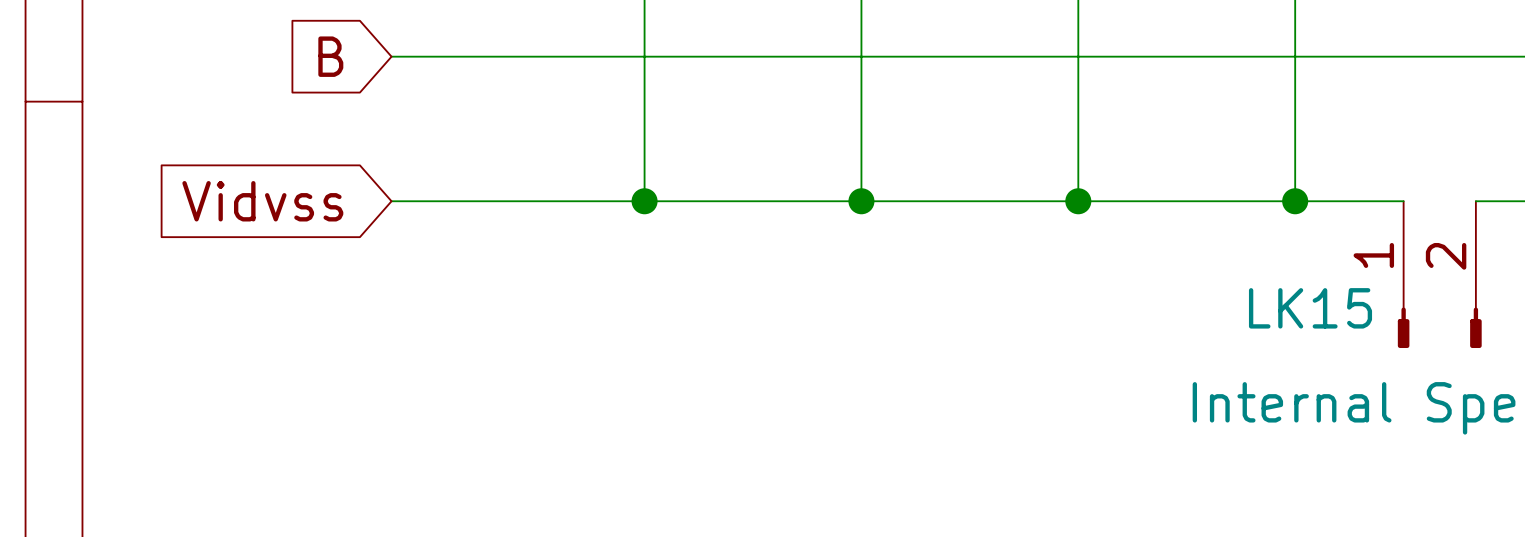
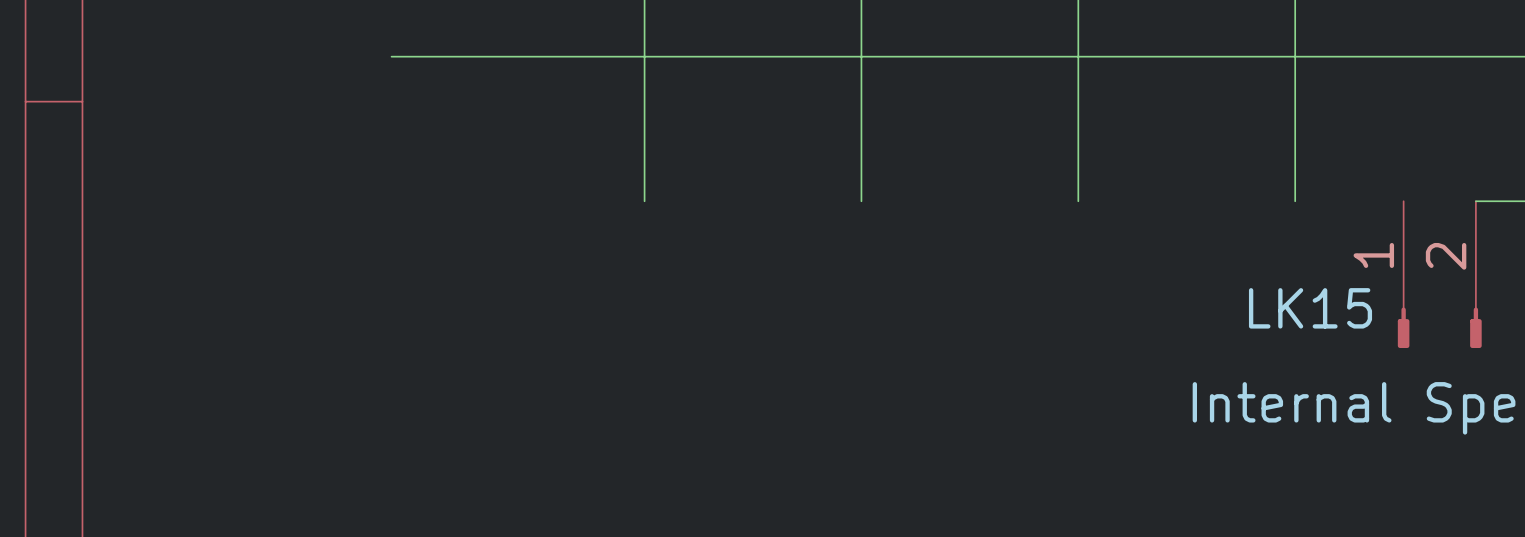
global label: B (330, 56) -> none
global label: Vidvss (262, 201) -> none
wire: (391, 201) (1403, 201) -> none
junction: (644, 201) -> none
junction: (861, 201) -> none
junction: (1078, 201) -> none
junction: (1295, 201) -> none

